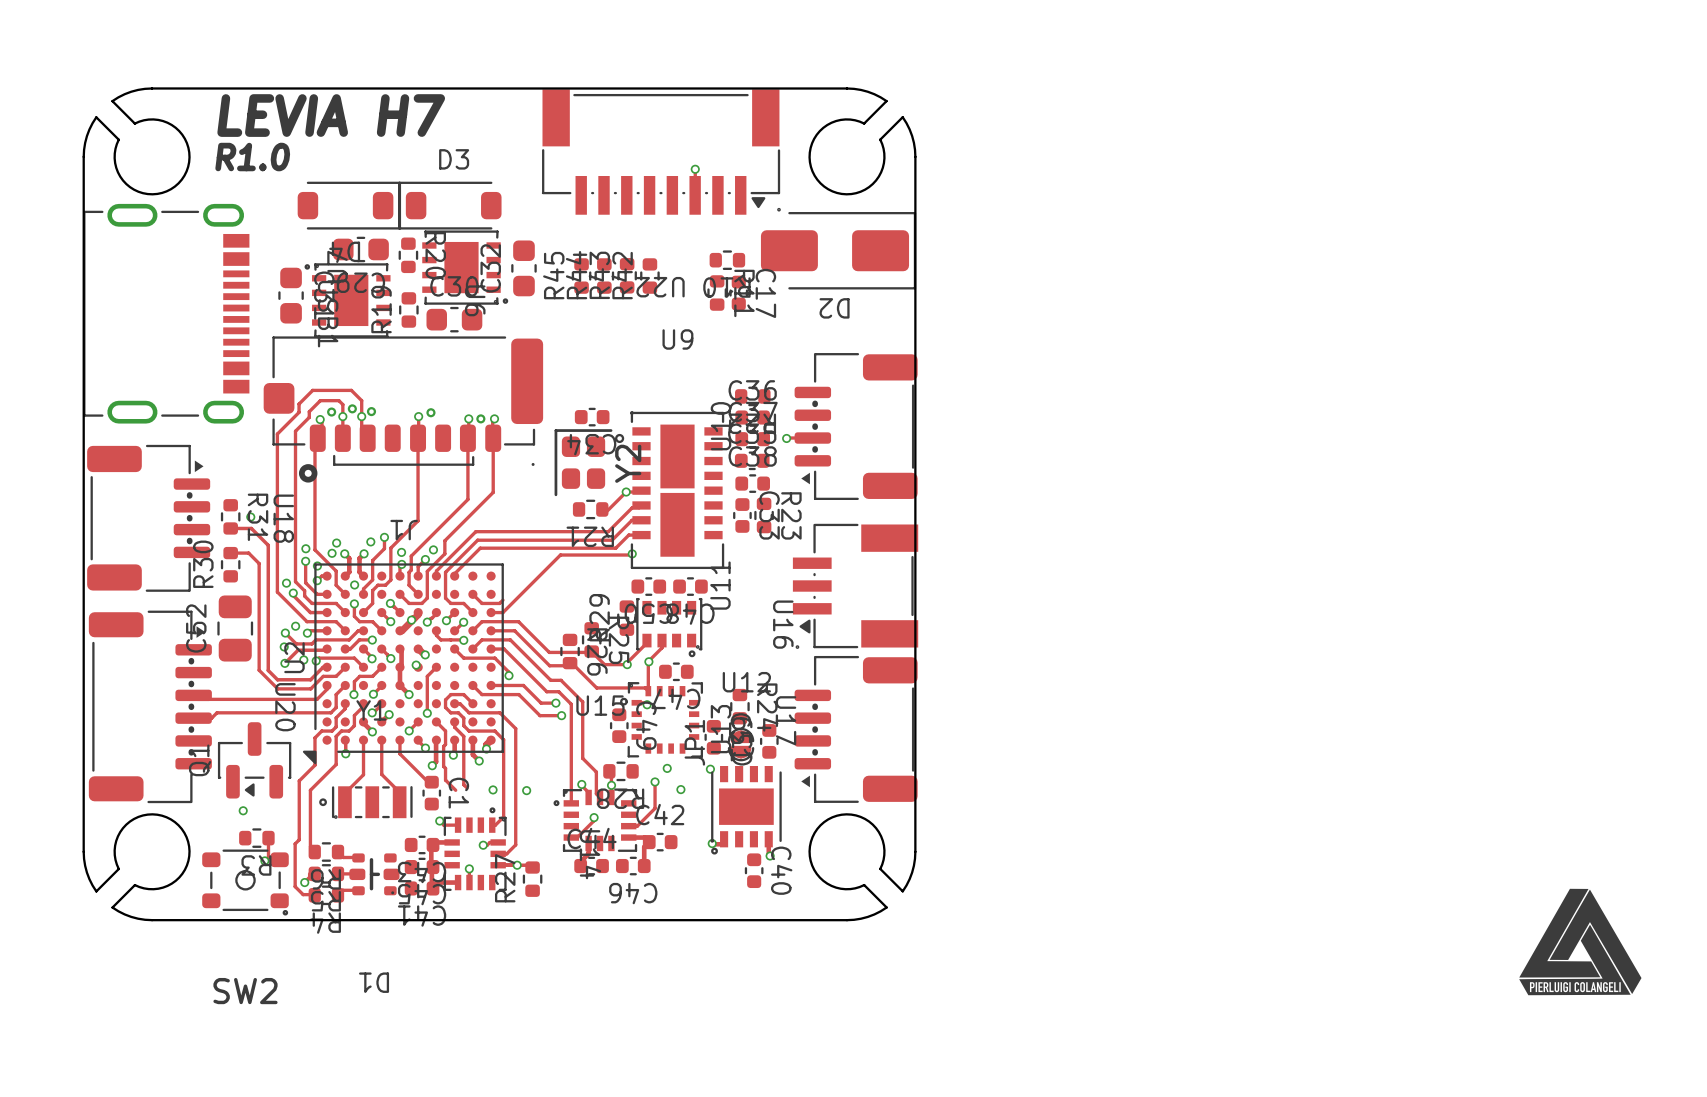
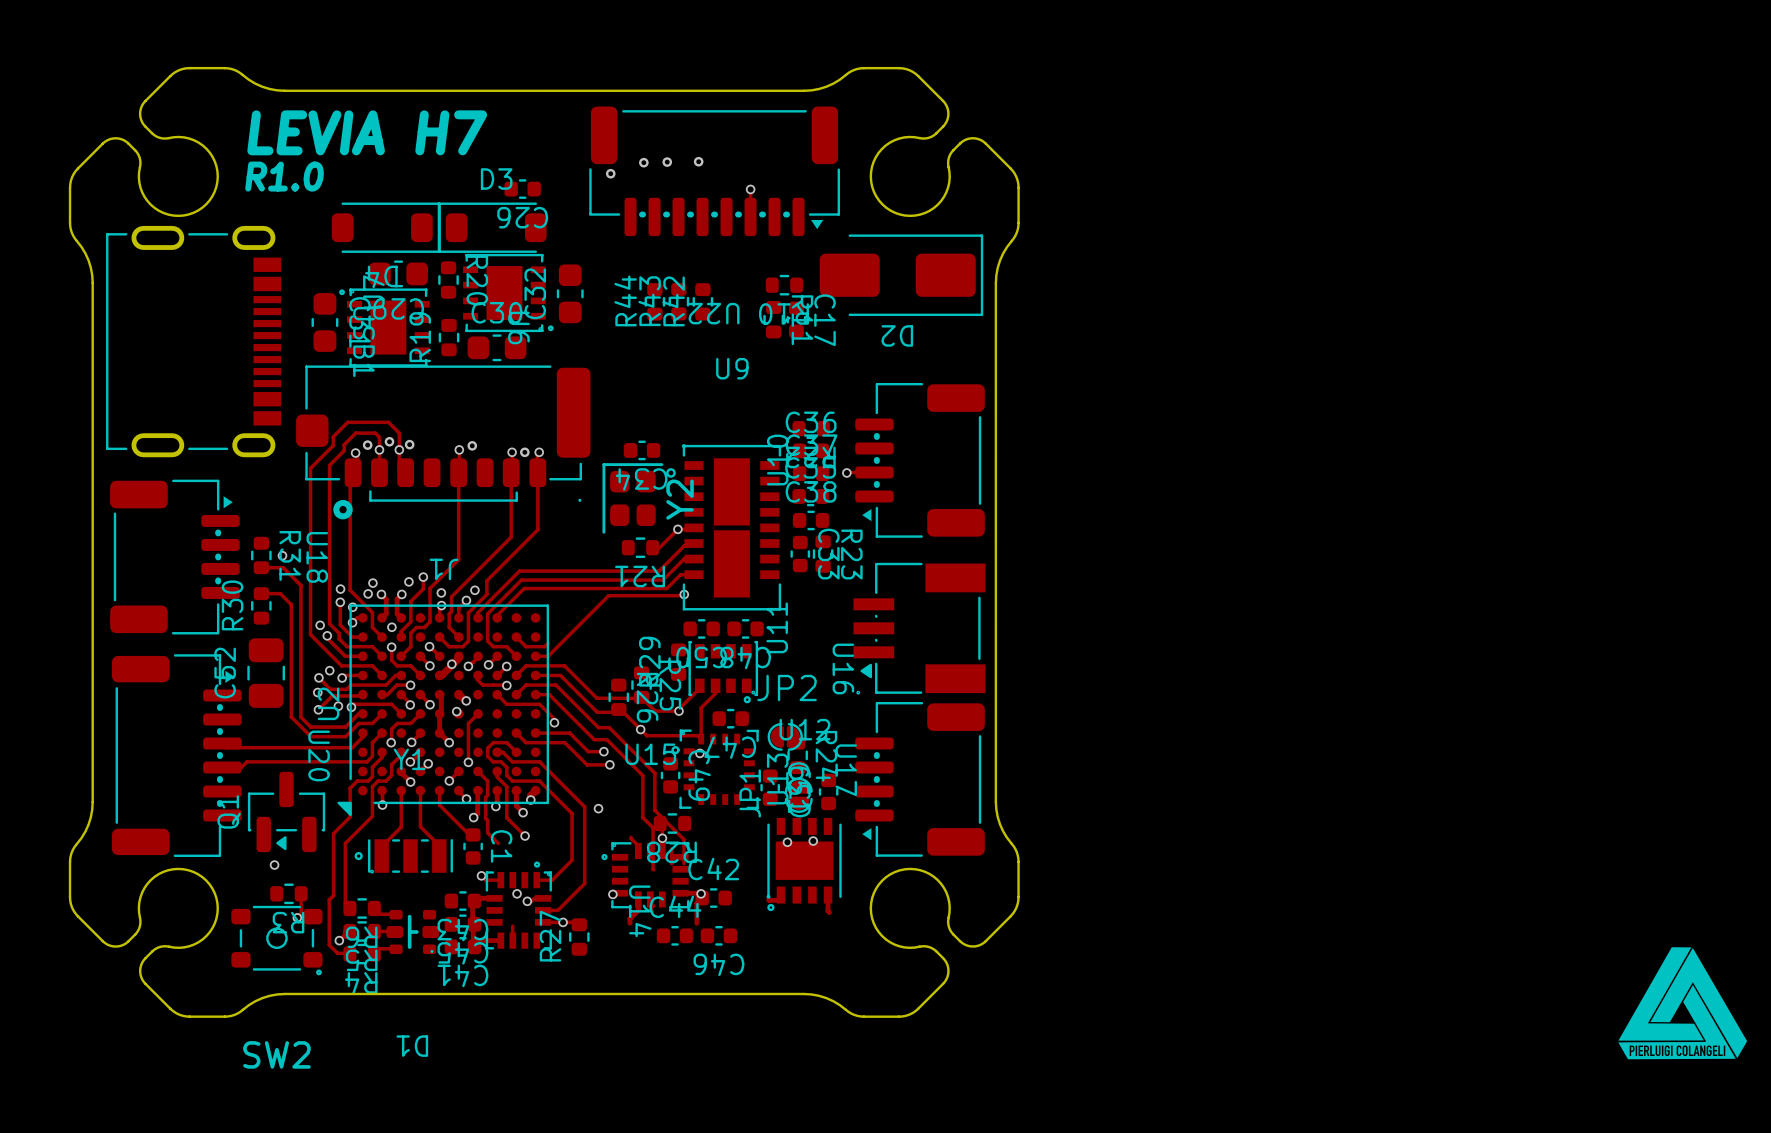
U22 footprint: [541, 89, 781, 215] -> [589, 106, 841, 237]
board edge: (894, 125) (902, 117) (912, 136) (915, 156) (915, 858) (909, 879) (902, 891) (880, 868) (884, 850) (878, 832) (865, 818) (851, 814) (832, 817) (820, 825) (812, 837) (809, 851) (814, 869) (823, 880) (836, 887) (845, 889) (864, 885) (886, 907) (867, 916) (847, 920) (145, 919) (131, 916) (112, 907) (134, 885) (153, 889) (171, 883) (184, 869) (189, 856) (188, 841) (181, 828) (166, 817) (152, 814) (134, 818) (120, 832) (114, 850) (118, 868) (110, 876) -> (960, 143) (972, 138) (983, 141) (1012, 170) (1018, 185) (1017, 229) (999, 260) (995, 282) (995, 801) (999, 824) (1017, 855) (1018, 897) (1016, 907) (1010, 916) (983, 942) (970, 946) (961, 942) (950, 930) (948, 922) (949, 907) (948, 897) (941, 883) (933, 876) (920, 870) (909, 868) (895, 872) (882, 880) (873, 893) (870, 908) (872, 918) (878, 931) (885, 939) (899, 946) (909, 947) (924, 946) (932, 948) (944, 959) (947, 966) (947, 975) (944, 982) (918, 1008) (909, 1014) (901, 1016) (860, 1016) (851, 1013) (826, 998) (803, 994) (284, 993) (262, 998) (231, 1015) (186, 1016) (172, 1011) (145, 983) (140, 975) (140, 966) (145, 958) (157, 947) (189, 946) (206, 935) (212, 927) (217, 913) (217, 902) (212, 888) (202, 877) (188, 870) (173, 869) (159, 873) (150, 880) (142, 892) (138, 907) (140, 924) (135, 934)
board edge: (887, 131) (880, 139) (884, 158) (878, 176) (865, 189) (846, 194) (832, 191) (820, 183) (810, 166) (809, 152) (816, 134) (827, 125) (845, 119) (864, 123) (886, 101) (867, 91) (854, 88) (152, 88) (131, 91) (112, 101) (134, 123) (153, 119) (167, 122) (175, 127) (186, 143) (189, 157) (184, 175) (174, 186) (162, 192) (147, 194) (134, 189) (120, 176) (114, 158) (118, 139) (96, 117) (89, 129) (84, 149) (83, 851) (86, 872) (96, 891) (104, 883) -> (953, 150) (948, 160) (949, 177) (946, 192) (941, 200) (929, 210) (915, 215) (899, 214) (886, 207) (876, 196) (872, 186) (871, 171) (875, 157) (881, 149) (899, 138) (930, 137) (943, 126) (947, 118) (947, 109) (943, 100) (915, 73) (902, 68) (857, 68) (826, 86) (803, 90) (284, 90) (262, 86) (237, 71) (227, 68) (186, 68) (176, 71) (170, 76) (144, 102) (140, 109) (140, 117) (144, 125) (155, 136) (164, 138) (179, 136) (189, 138) (202, 145) (209, 152) (216, 166) (217, 181) (212, 196) (206, 204) (198, 210) (183, 215) (168, 214) (154, 208) (147, 201) (140, 187) (138, 177) (140, 162) (137, 153) (126, 142) (118, 138) (104, 142) (78, 168) (72, 177) (70, 187) (70, 229) (88, 260) (92, 282) (92, 802) (88, 824) (70, 855) (70, 899) (76, 914) (104, 942) (115, 946) (128, 941)
via: none -> (698, 161)
via: none -> (643, 162)
via: none -> (667, 162)
via: none -> (610, 173)
C26: none -> (522, 189)
R45: (581, 276) -> none
via: (648, 661) -> none
via: none -> (640, 729)
JP2: none -> (785, 736)
track: (582, 701) (582, 758) (596, 772) (596, 793) (600, 797) -> (632, 750) (654, 773) (654, 810) (683, 839) (683, 863)
track: (571, 704) (571, 803) -> (620, 752) (642, 775) (642, 817) (653, 827) (653, 869)
track: (495, 712) (499, 712) (515, 728) (515, 844) (506, 853) -> (539, 761) (584, 806) (584, 883) (557, 910) (552, 910)
track: (503, 739) (503, 816) (495, 825) -> (548, 790) (572, 813) (572, 860) (552, 880) (540, 880)
via: none -> (598, 808)
track: (463, 765) (463, 784) (467, 787) -> (506, 817) (525, 836)
via: (667, 768) -> none
via: (710, 769) -> none
track: (655, 781) (655, 808) (637, 826) (628, 826) -> none
via: (655, 781) -> none
via: (581, 784) -> none
via: none -> (813, 841)
via position: (493, 789) -> (525, 836)
via: (680, 789) -> none
via: none -> (787, 842)
via: (526, 790) -> none
track: none -> (671, 848) (671, 863)
track: (594, 817) (594, 820) (577, 837) (571, 837) -> none
via: (594, 817) -> none
via: none -> (517, 893)
via: none -> (612, 894)
via: none -> (701, 893)
via: (712, 843) -> none
track: none -> (653, 905) (650, 908) (652, 911)
via: (770, 856) -> none
C44 position: (591, 866) -> (675, 935)
C46 position: (633, 866) -> (718, 935)
via: (469, 868) -> none
C40: (754, 870) -> none

